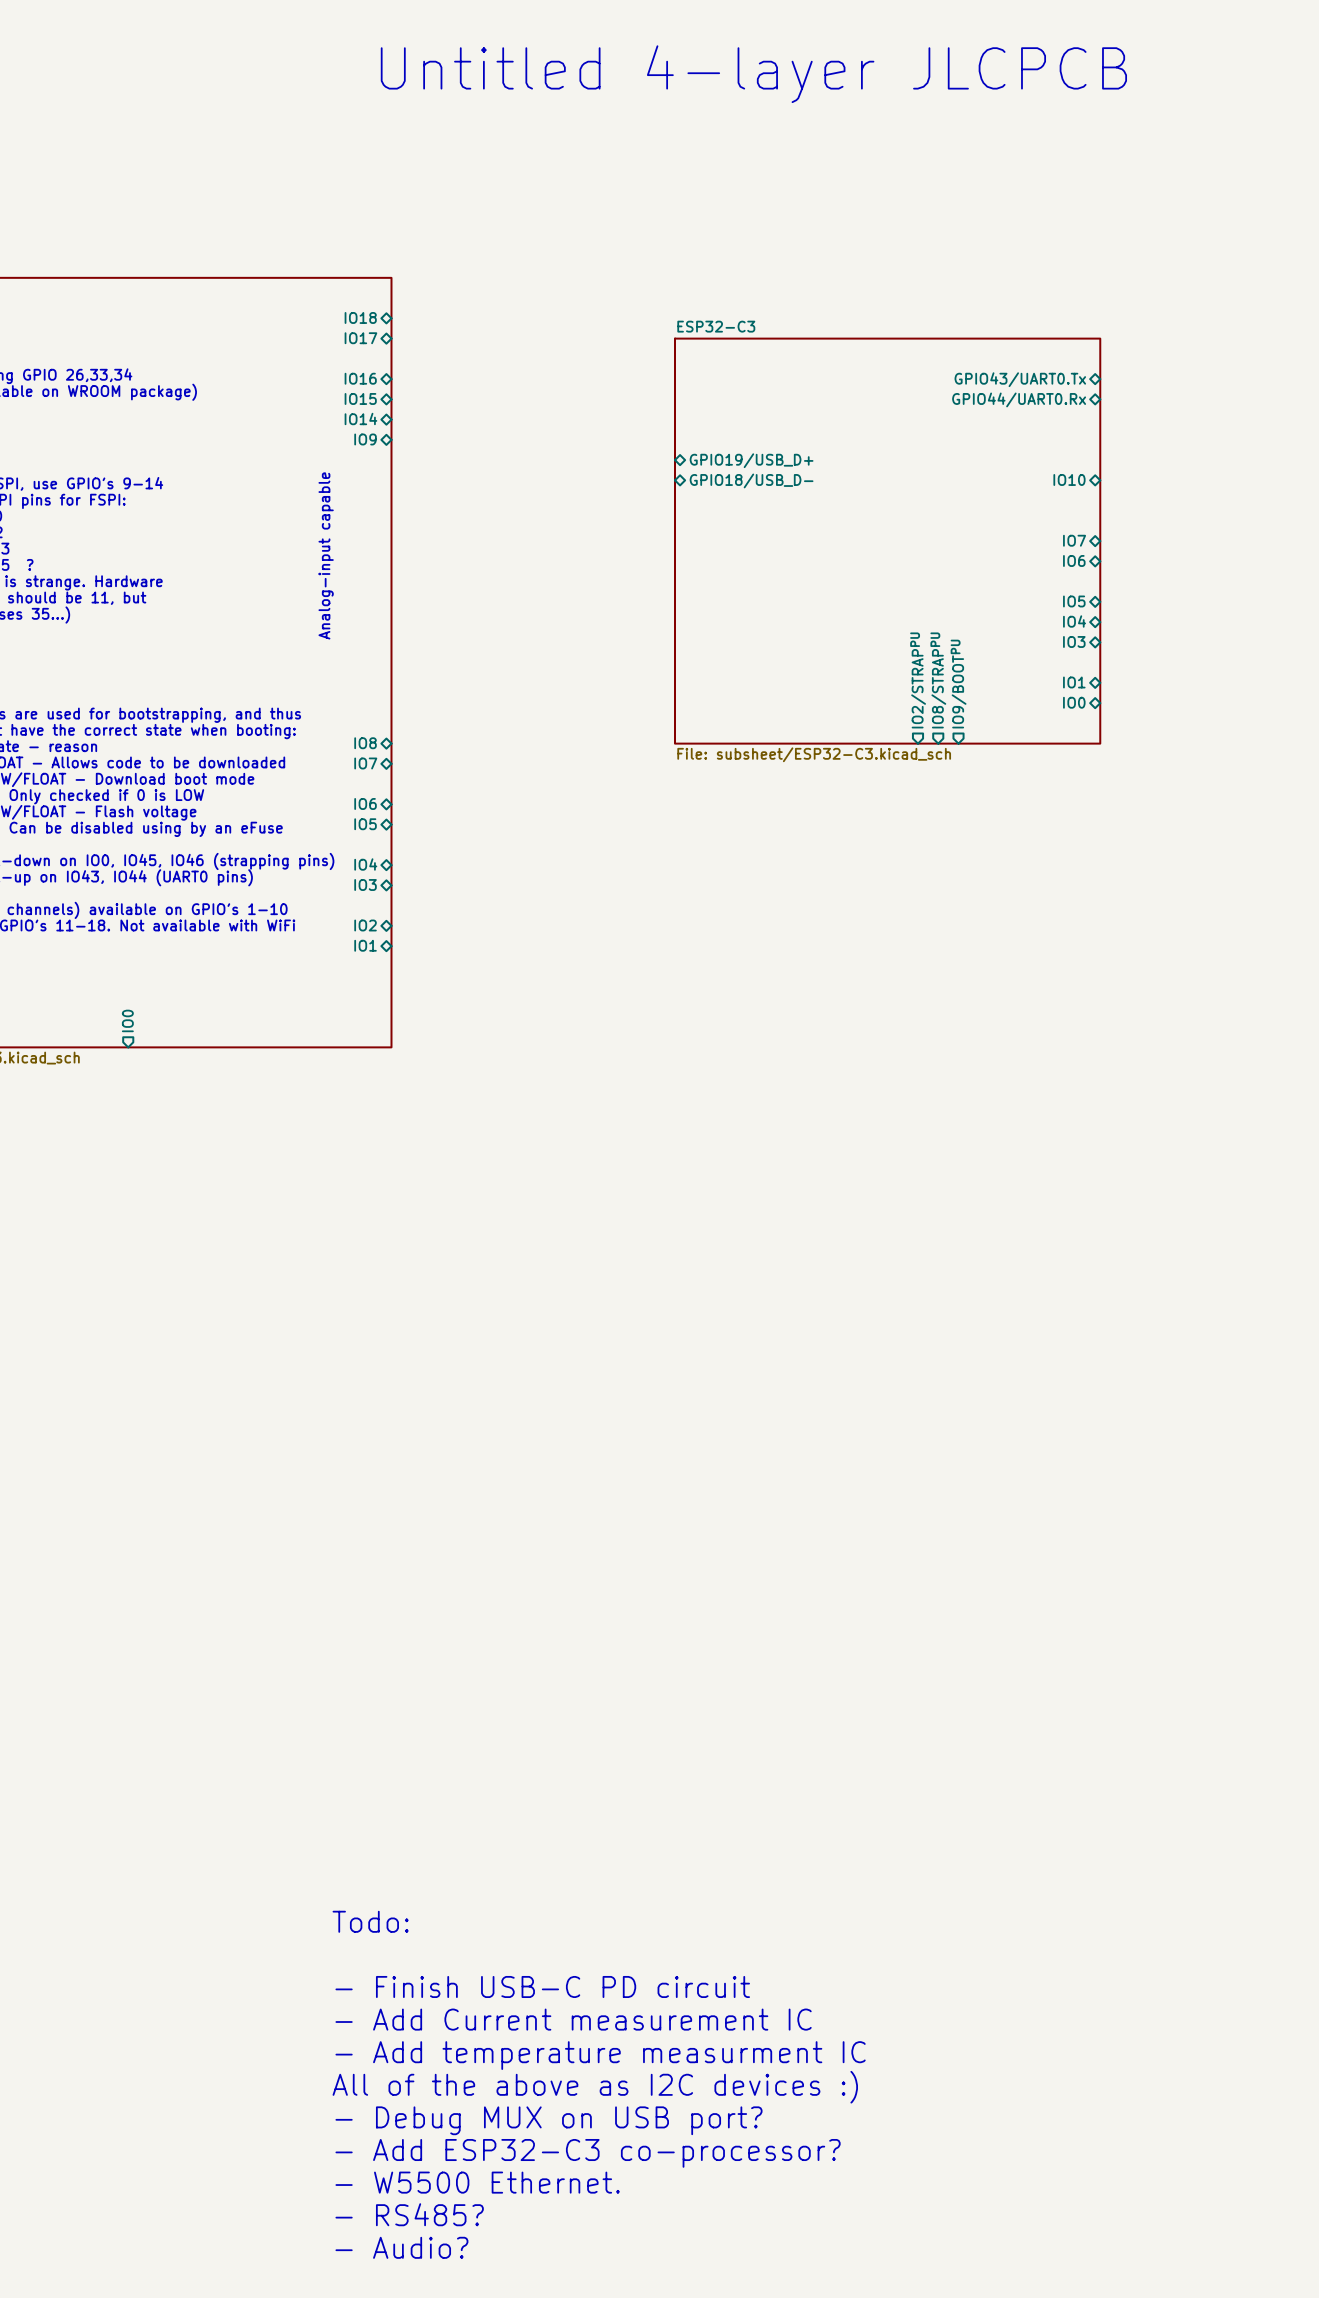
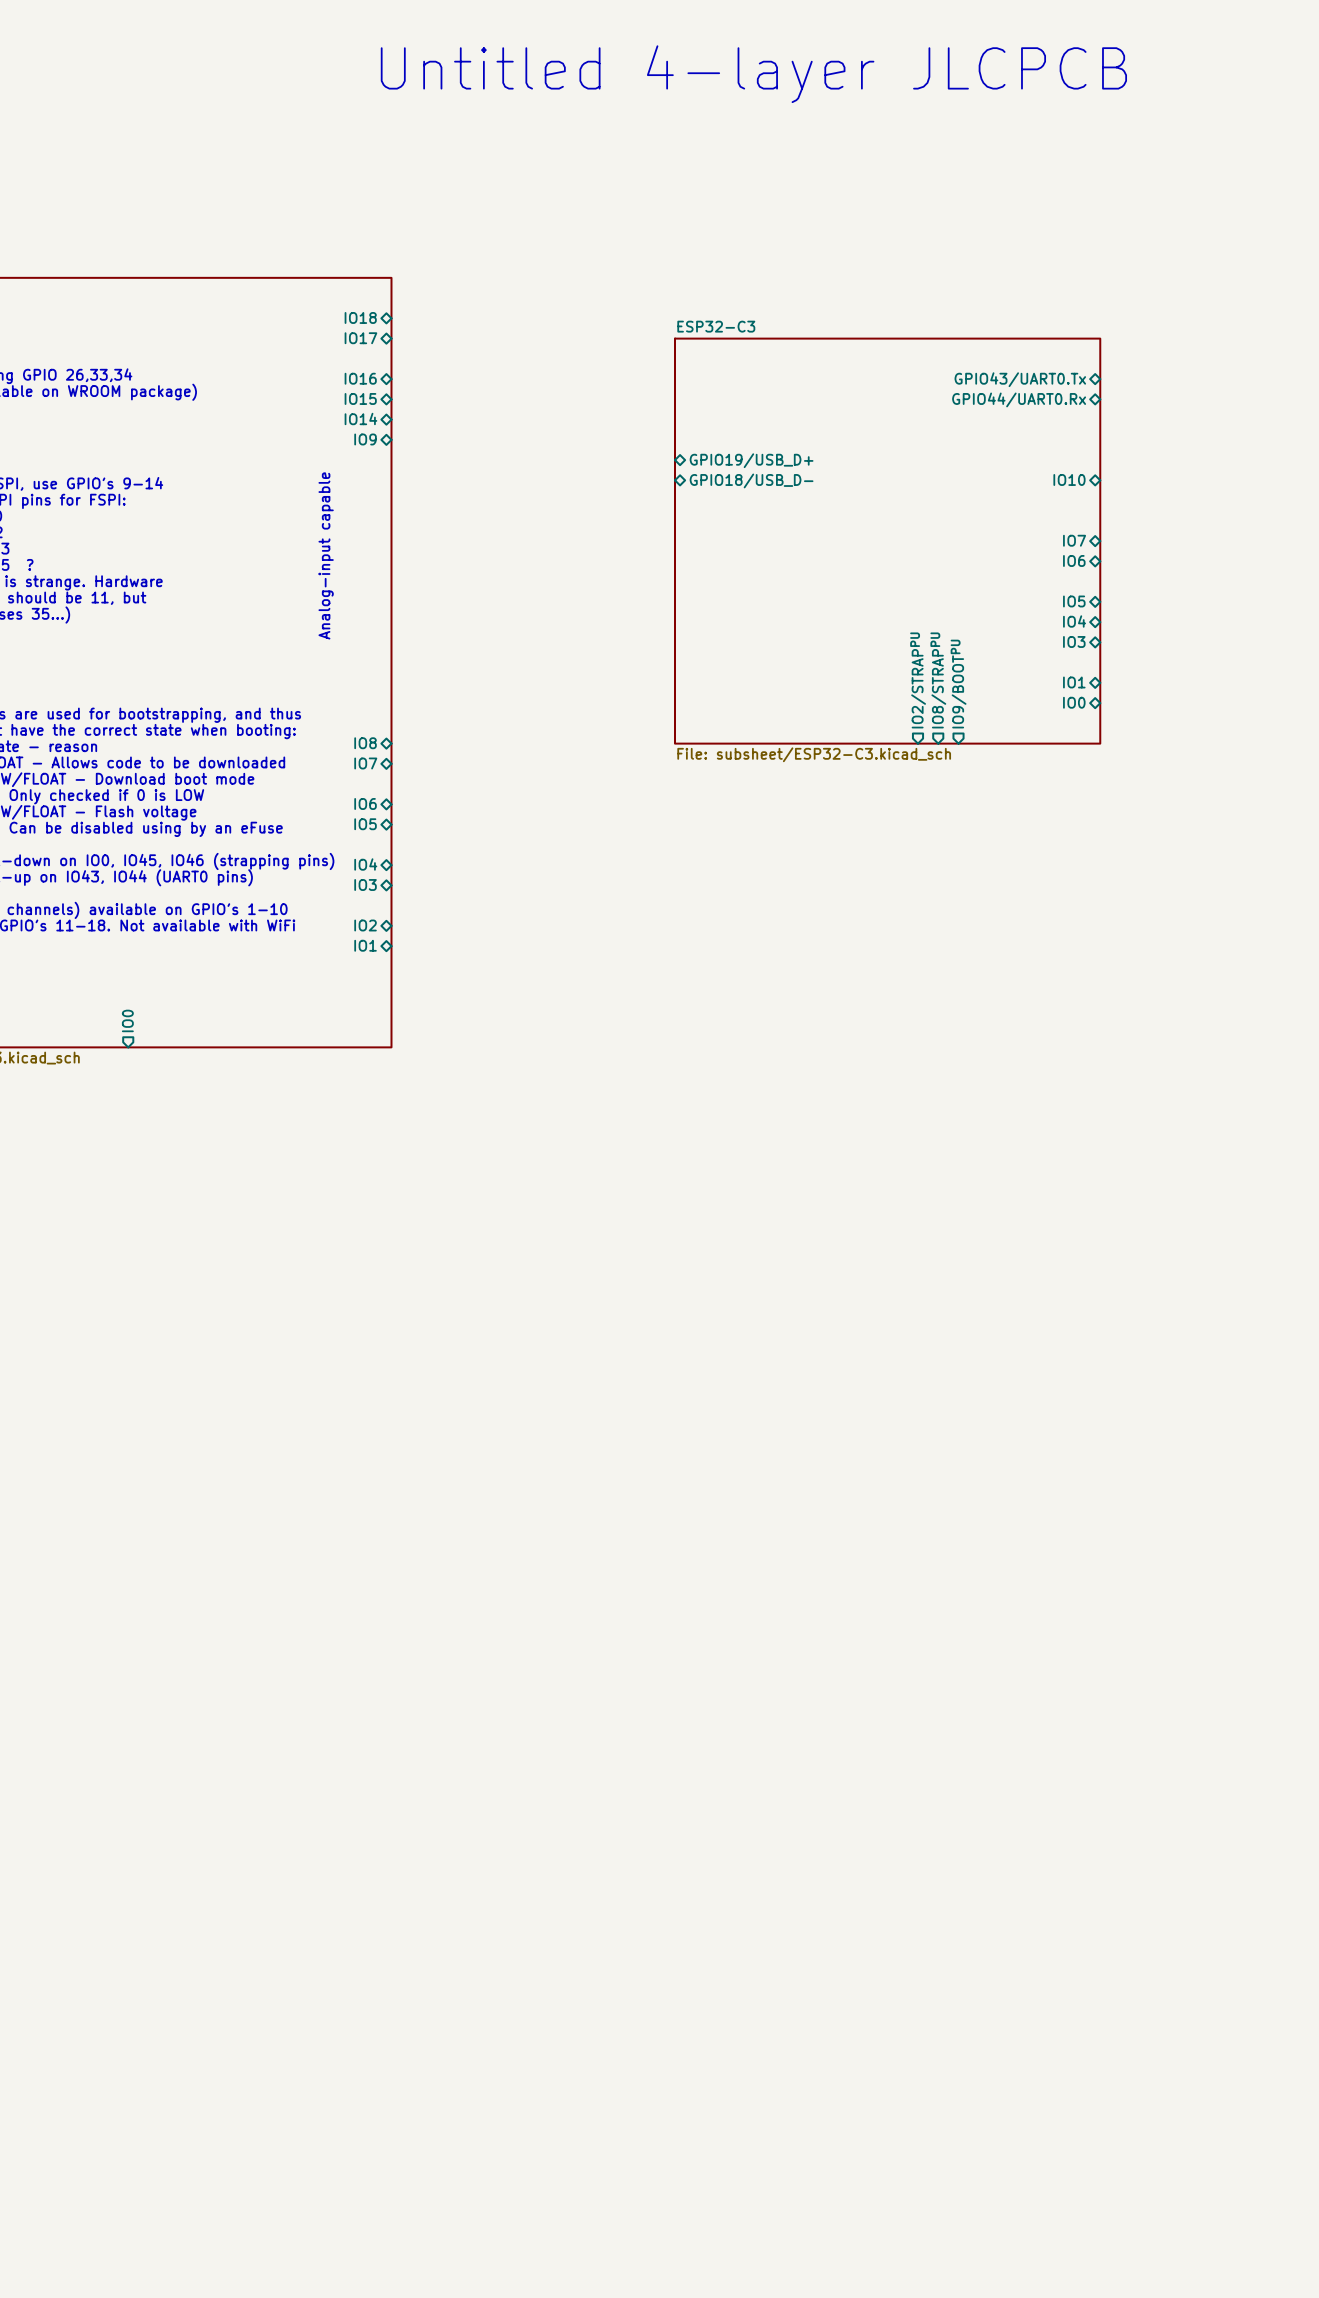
text: Todo: (370, 1921) -> none
text: - Finish USB-C PD circuit (542, 1986) -> none
text: - Add Current measurement IC (573, 2019) -> none
text: - Add temperature measurment IC (600, 2055) -> none
text: All of the above as I2C devices :) (595, 2087) -> none
text: - Debug MUX on USB port? (548, 2120) -> none
text: - Add ESP32-C3 co-processor? (588, 2153) -> none
text: - W5500 Ethernet. (477, 2182) -> none
text: - RS485? (409, 2214) -> none
text: - Audio? (401, 2247) -> none

